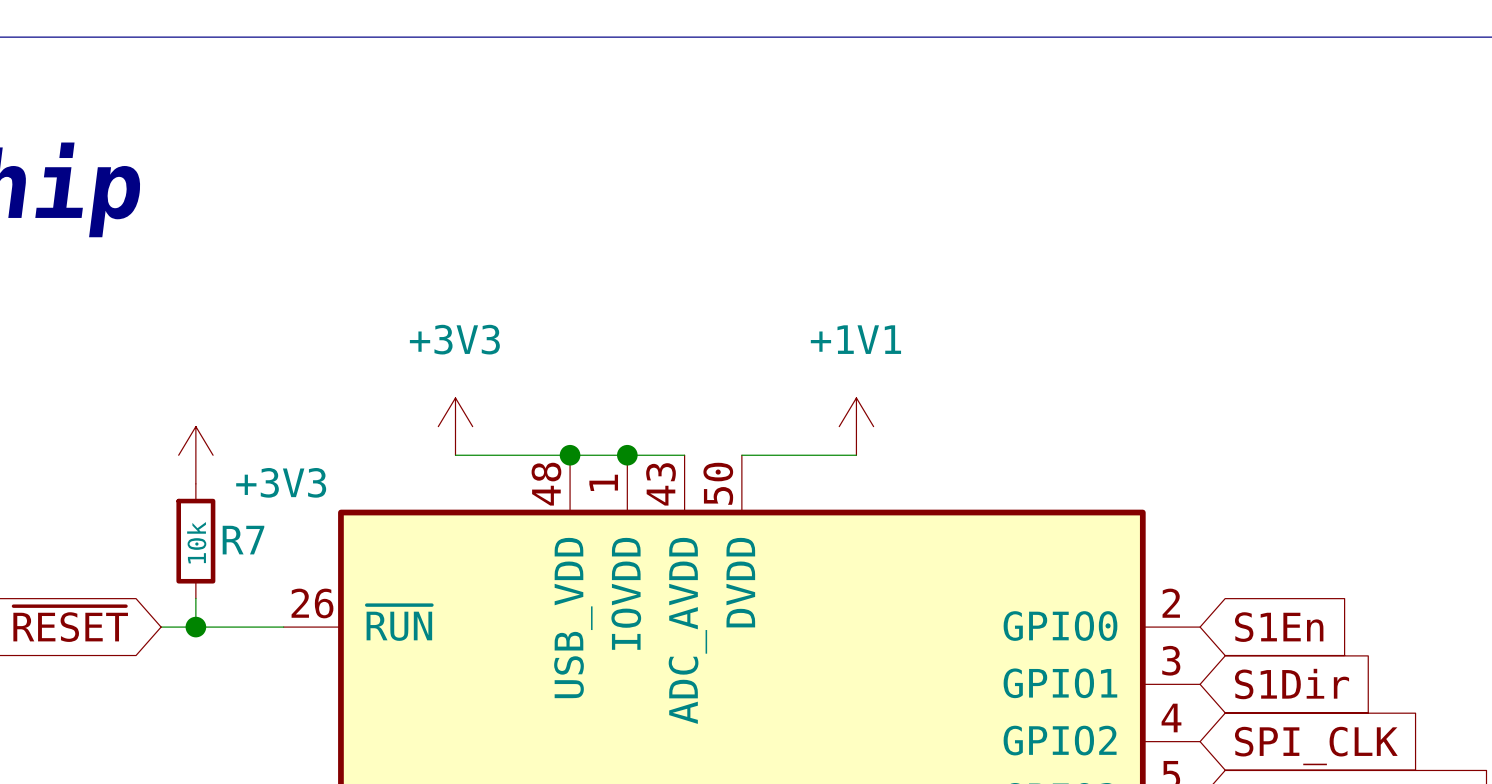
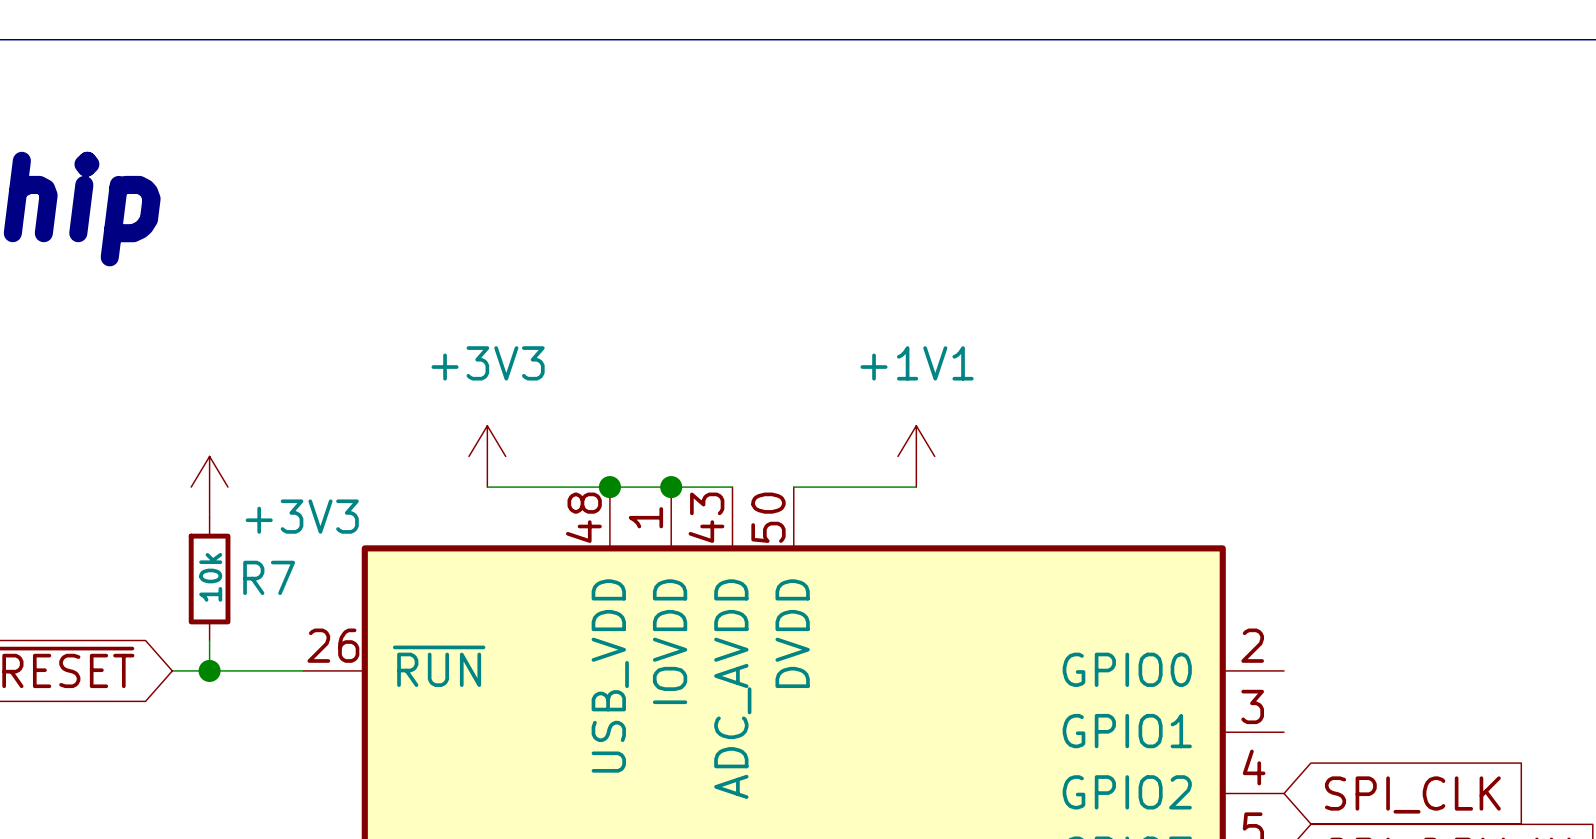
global label: S1En (1279, 627) -> none
global label: S1Dir (1292, 684) -> none

